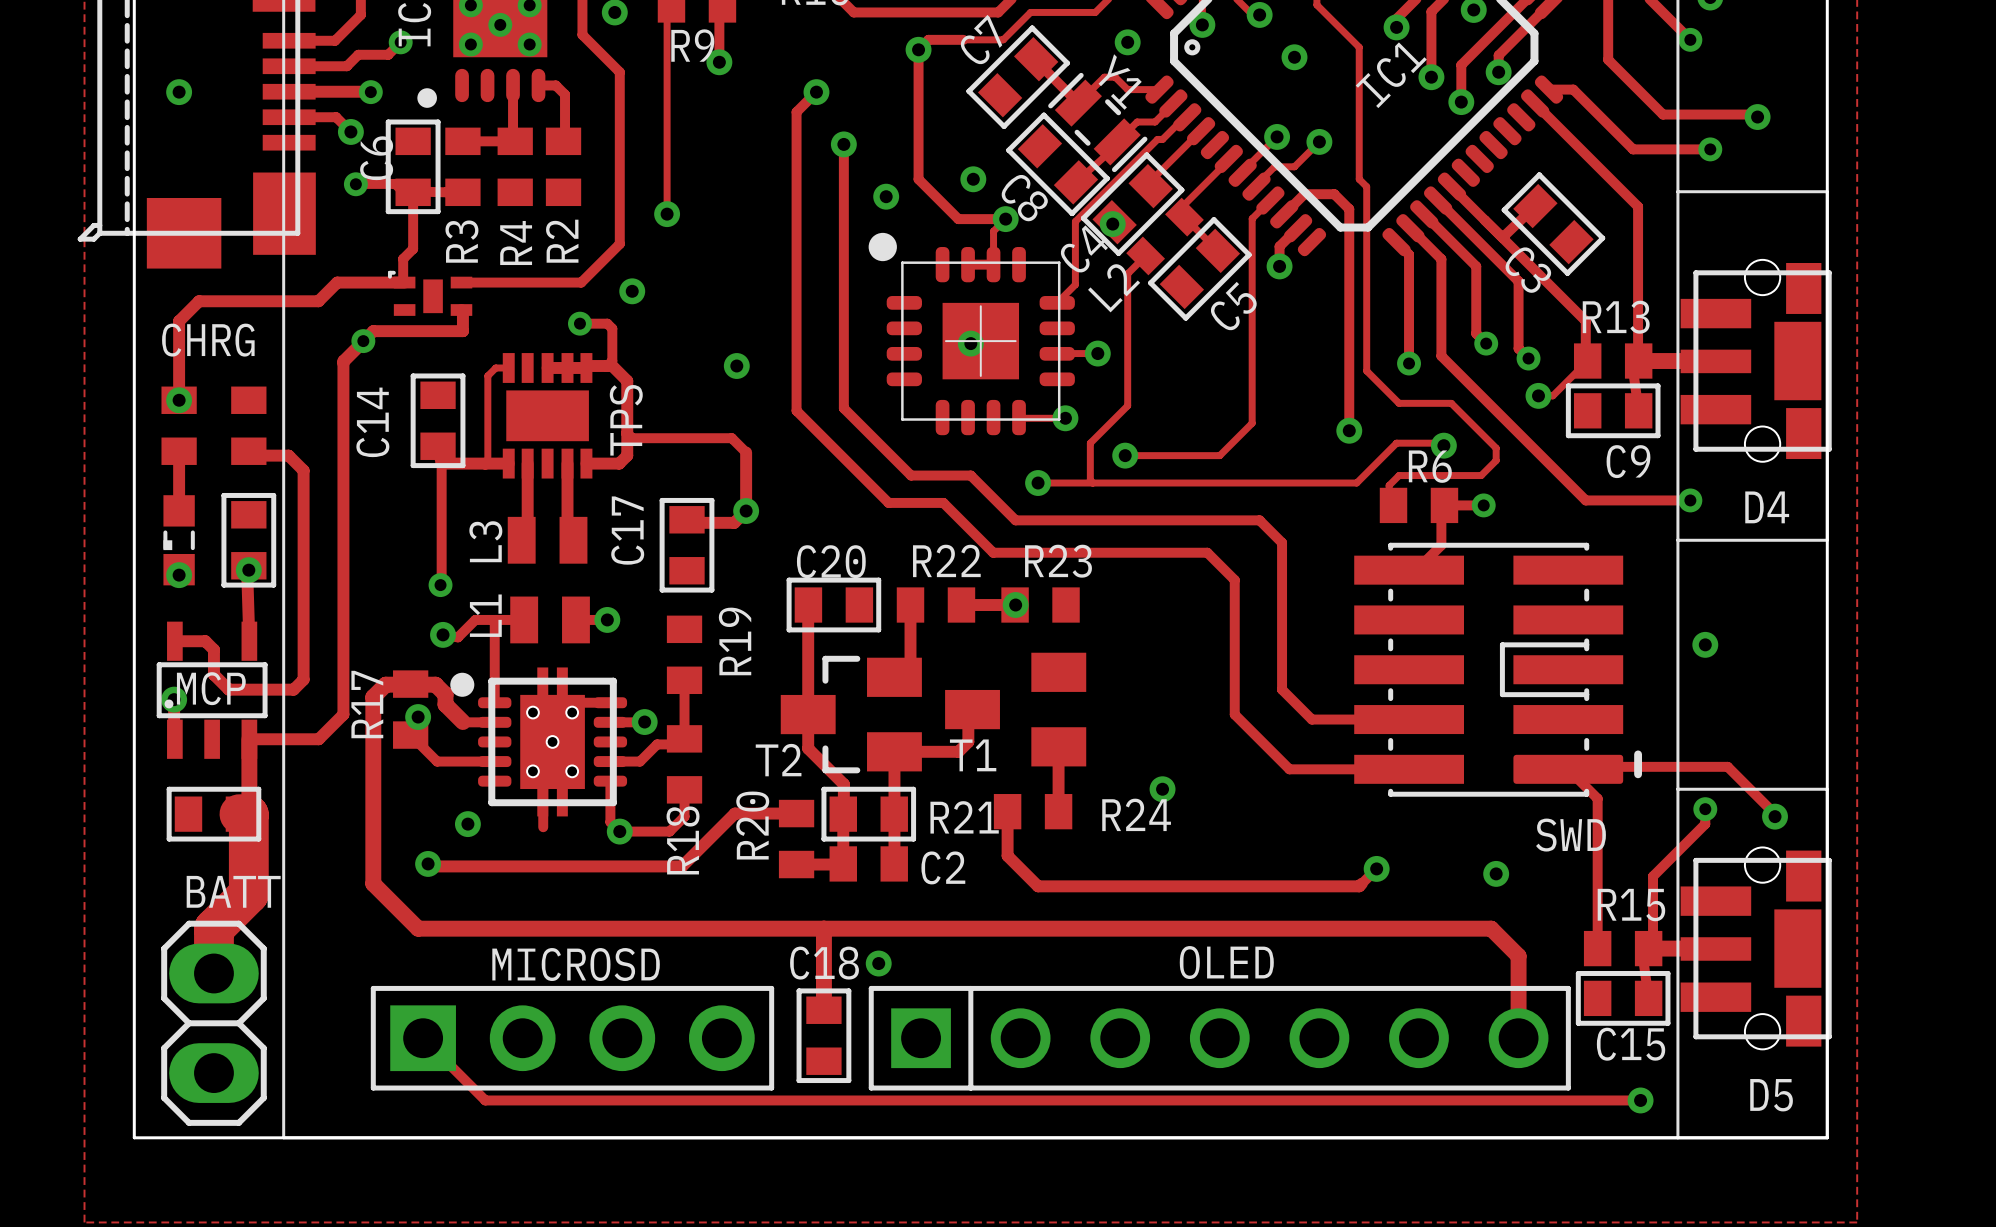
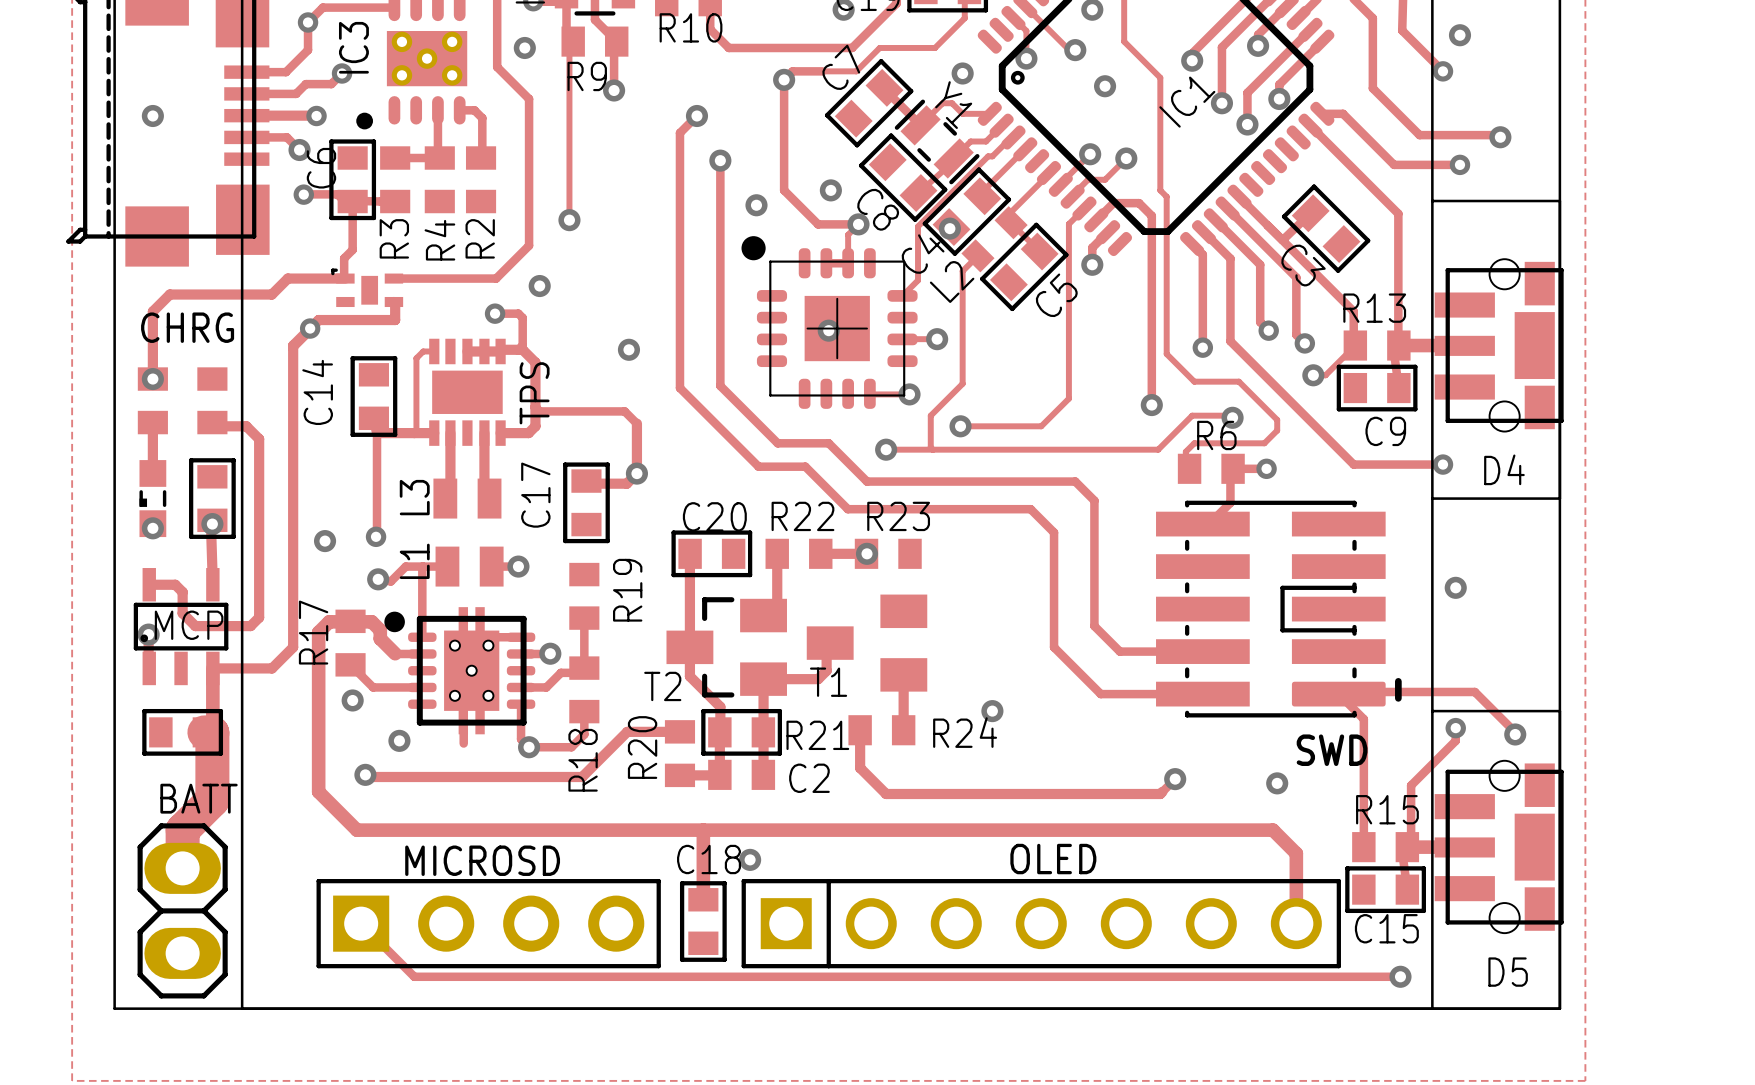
via: none -> (325, 541)
via position: (418, 717) -> (352, 700)

